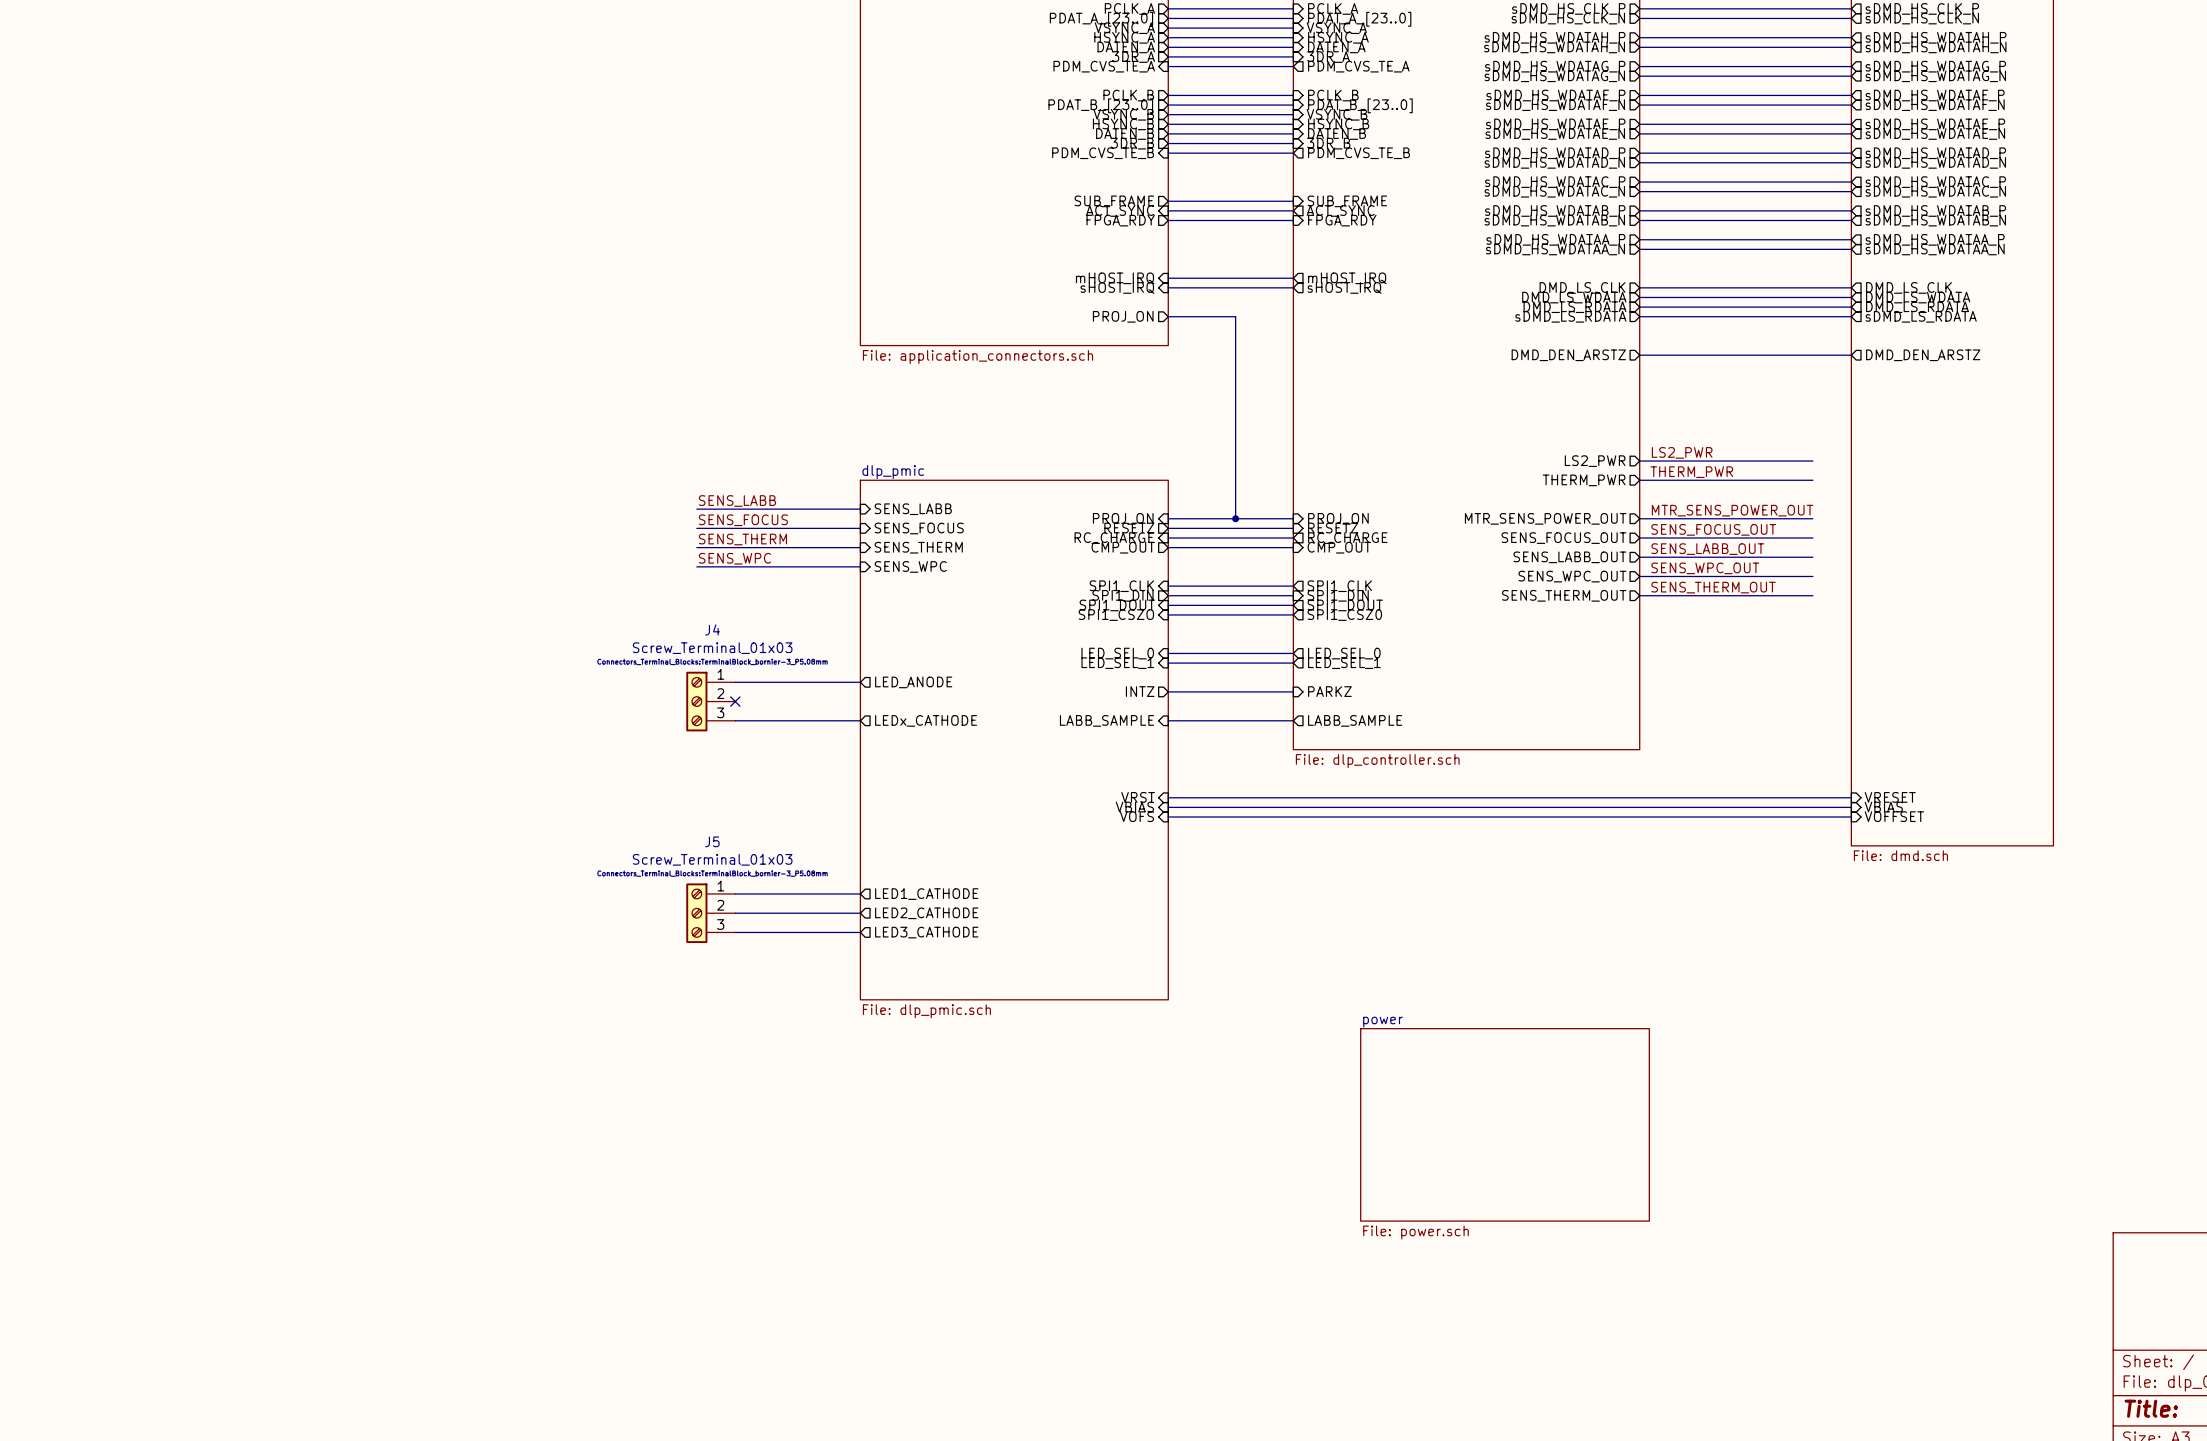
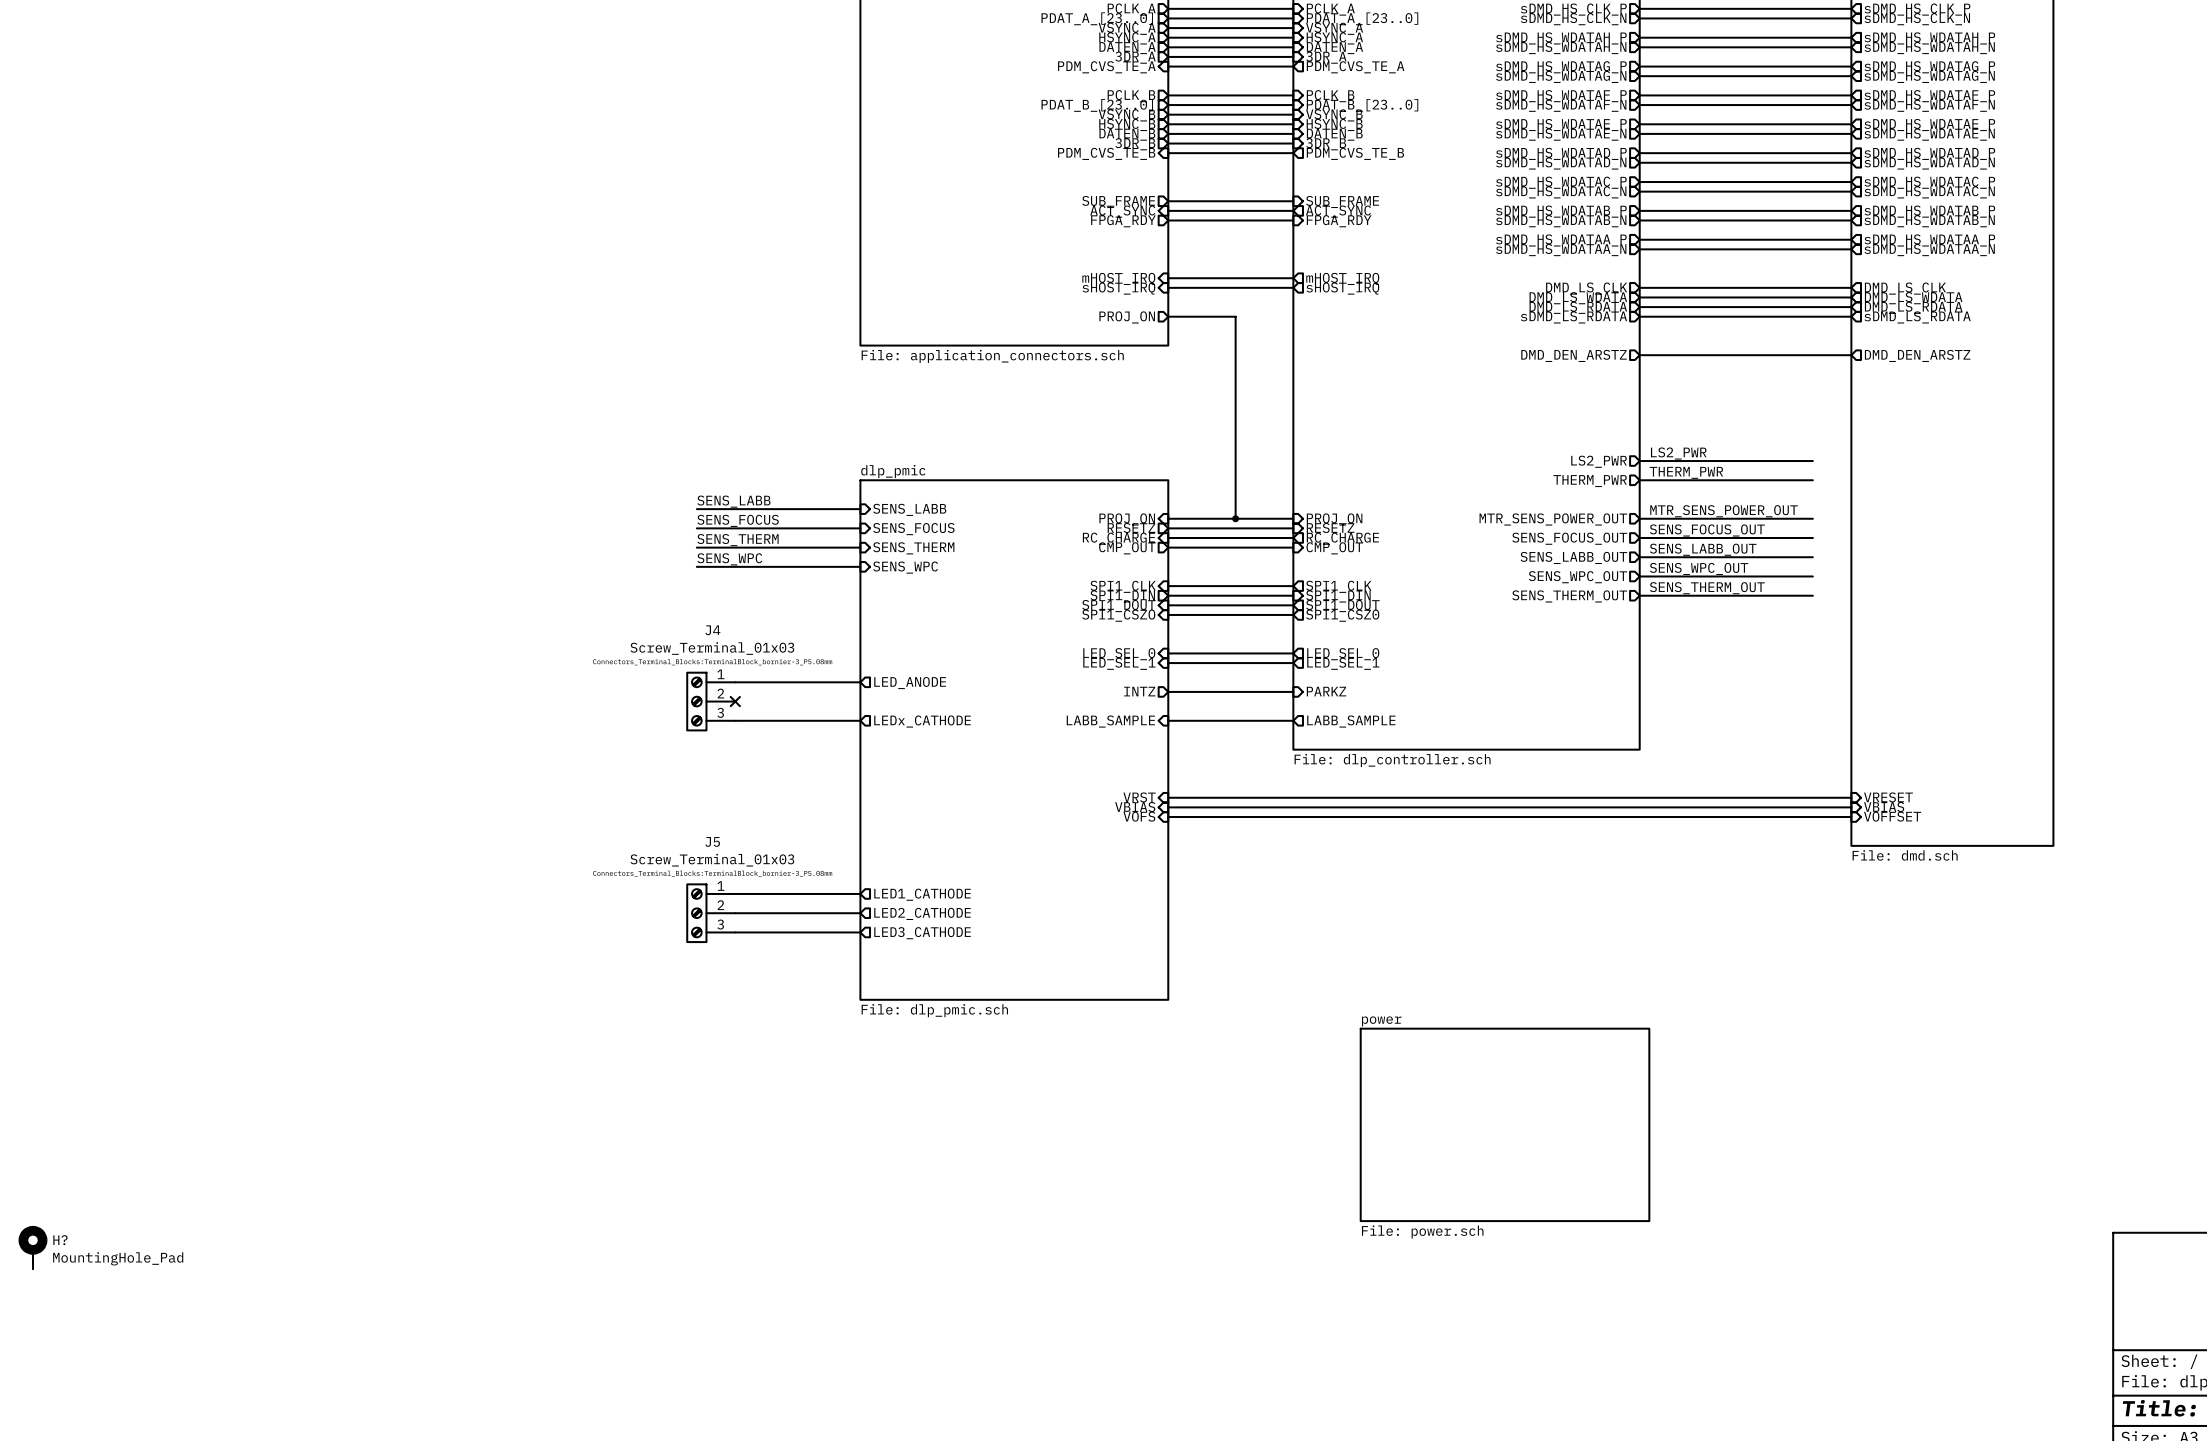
H?: none -> MountingHole_Pad (32, 1247)

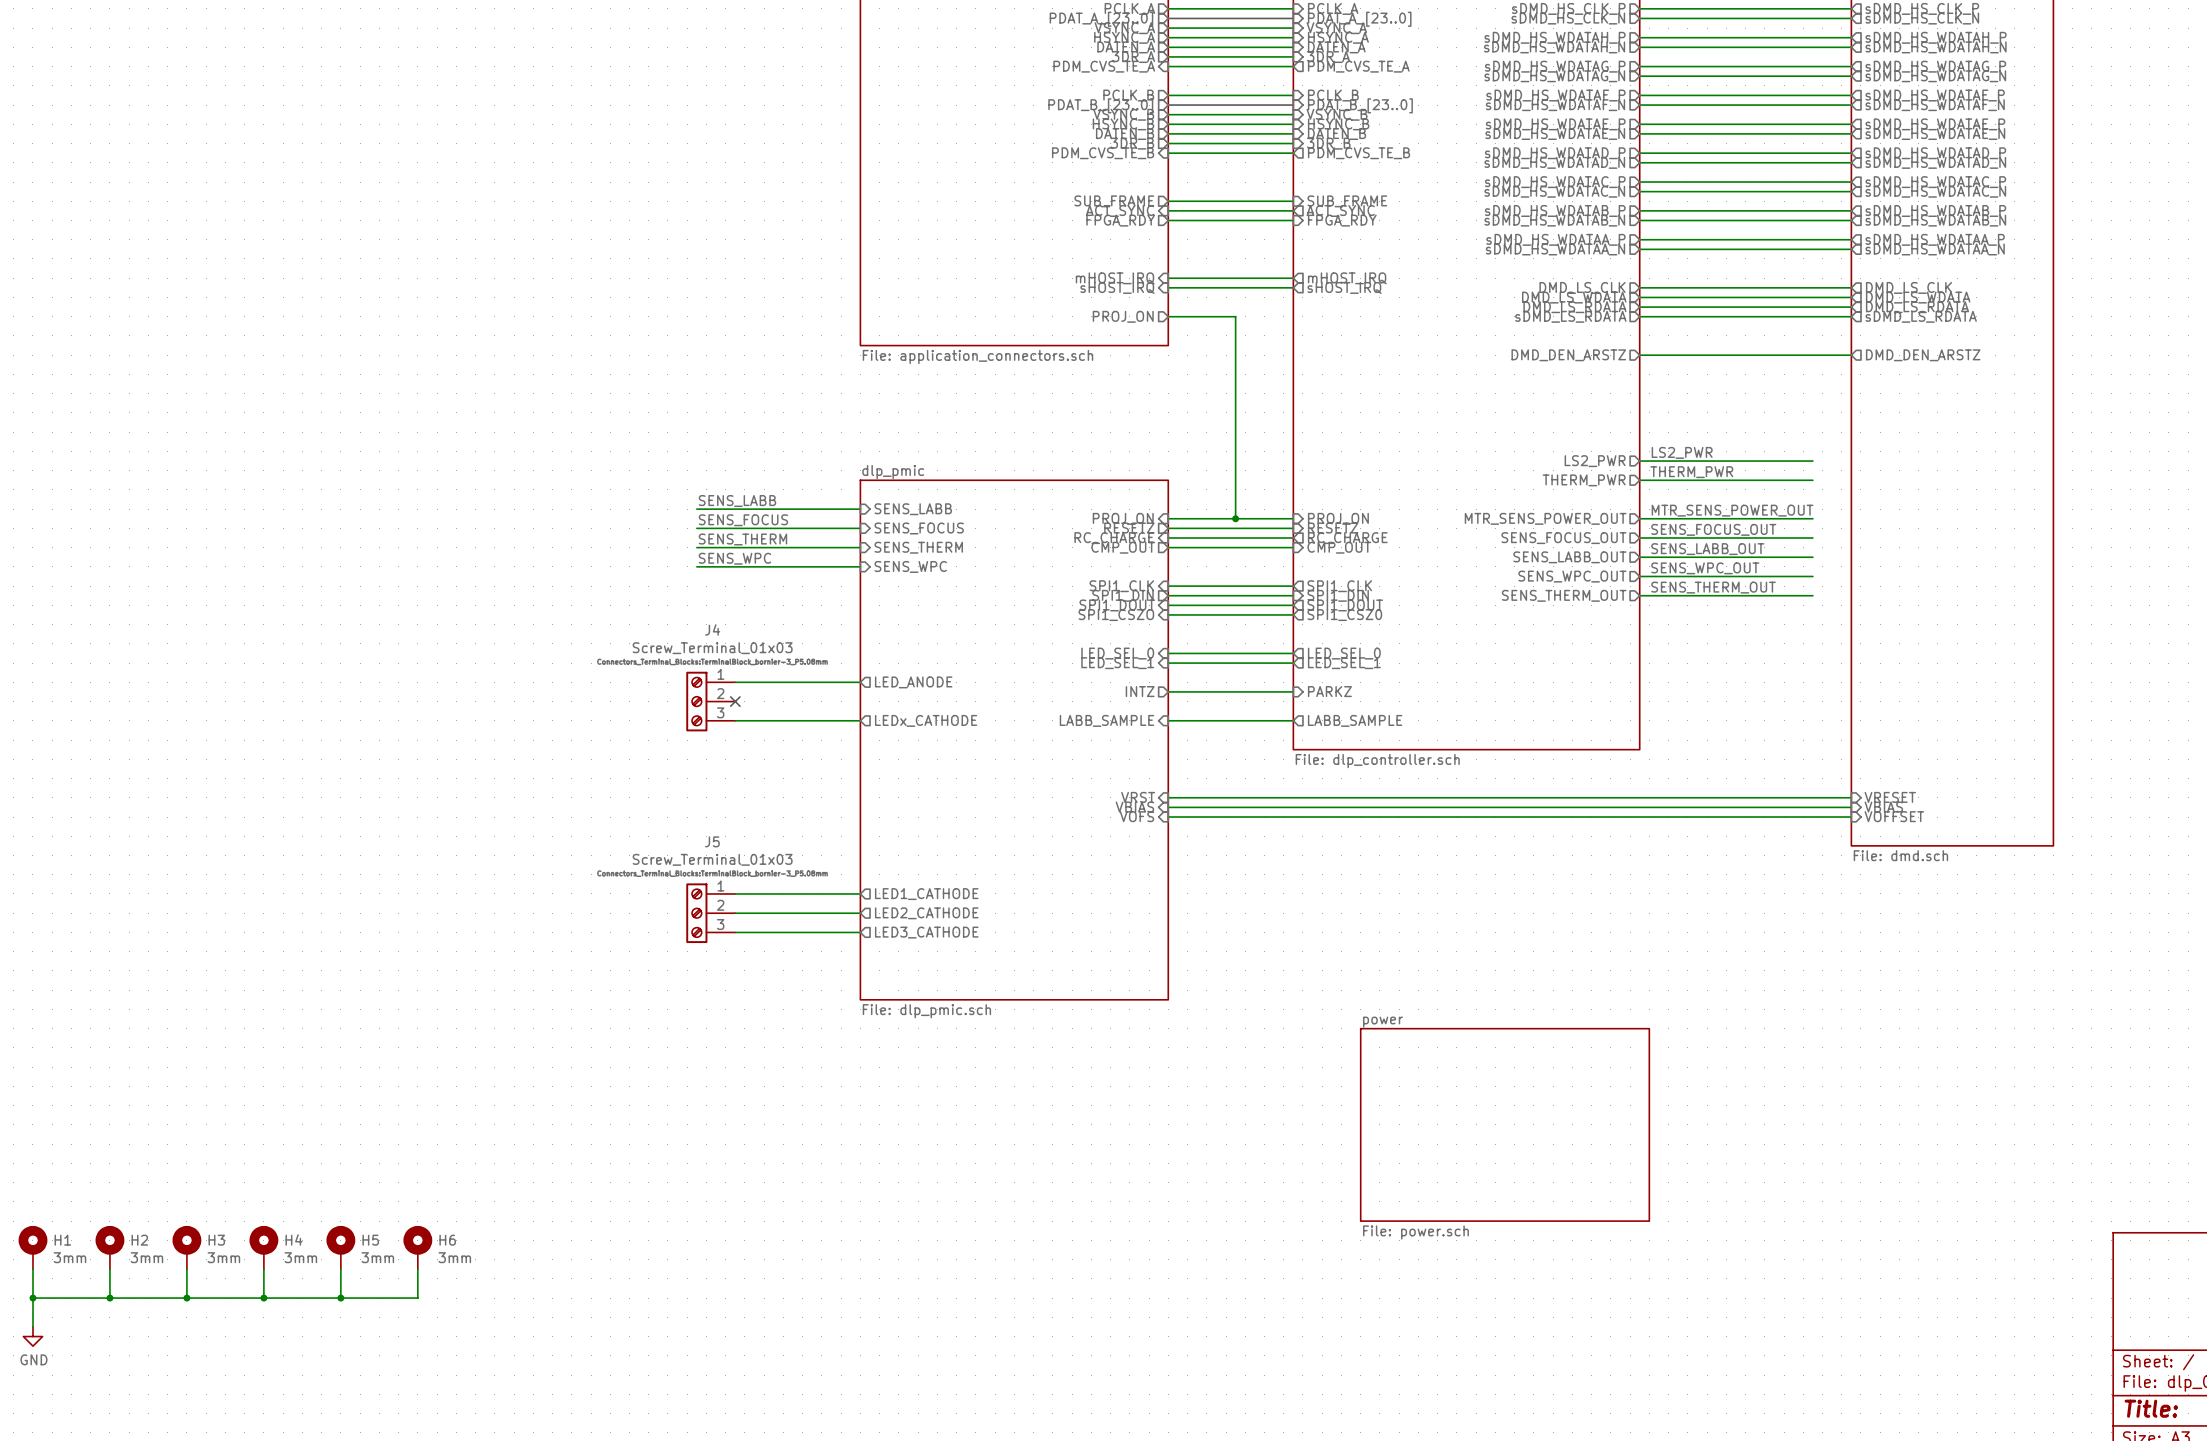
H? name: H? (60, 1240) -> H1 (62, 1240)
H2: none -> 3mm (109, 1247)
H3: none -> 3mm (186, 1247)
H4: none -> 3mm (263, 1247)
H5: none -> 3mm (340, 1247)
H6: none -> 3mm (417, 1247)
H? value: MountingHole_Pad (118, 1258) -> 3mm (69, 1257)
wire: none -> (32, 1269) (32, 1326)
wire: none -> (109, 1269) (109, 1298)
wire: none -> (186, 1269) (186, 1298)
wire: none -> (263, 1269) (263, 1298)
wire: none -> (340, 1269) (340, 1298)
wire: none -> (417, 1269) (417, 1298) (32, 1298)
junction: none -> (32, 1298)
junction: none -> (109, 1298)
junction: none -> (186, 1298)
junction: none -> (263, 1298)
junction: none -> (340, 1298)
power symbol: none -> GND (32, 1336)

